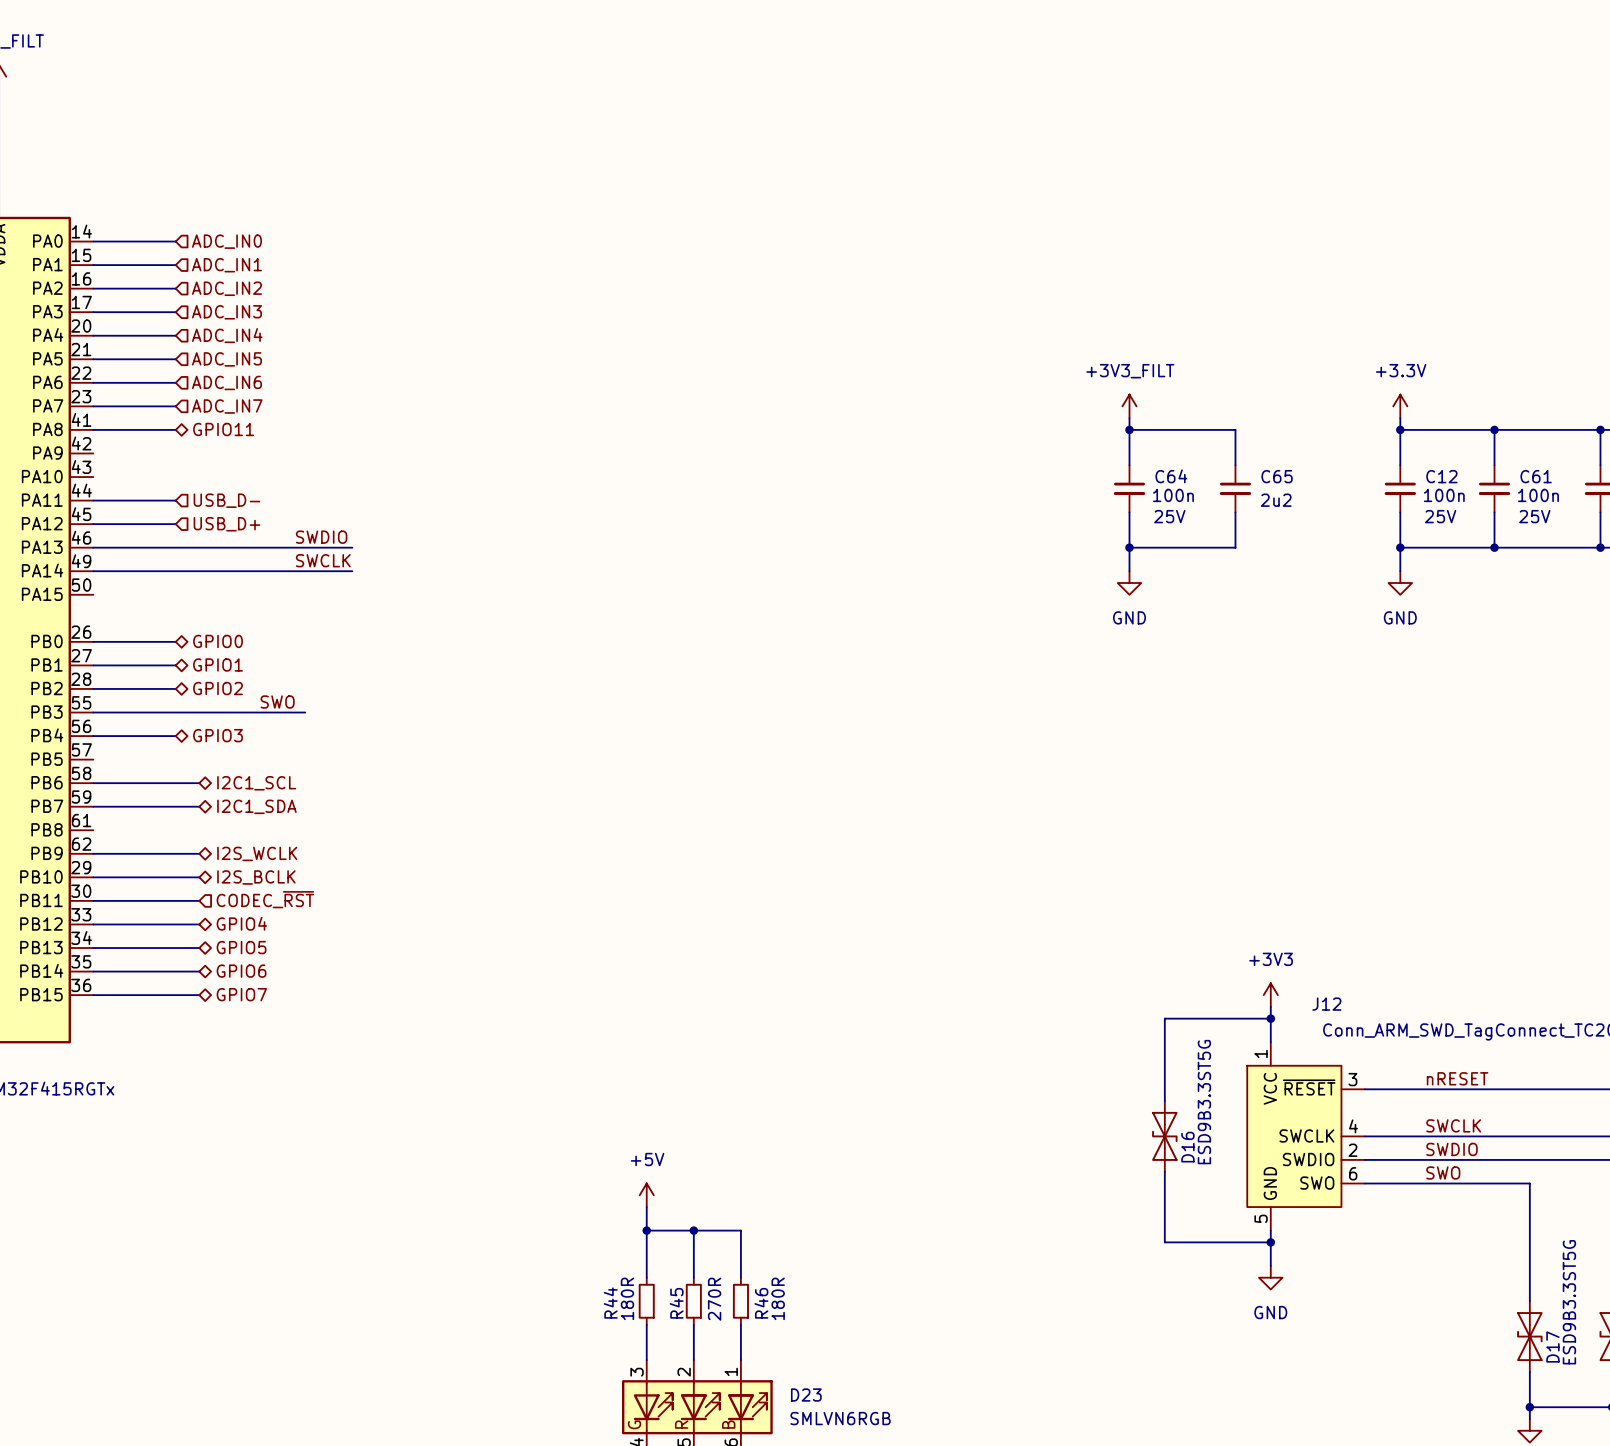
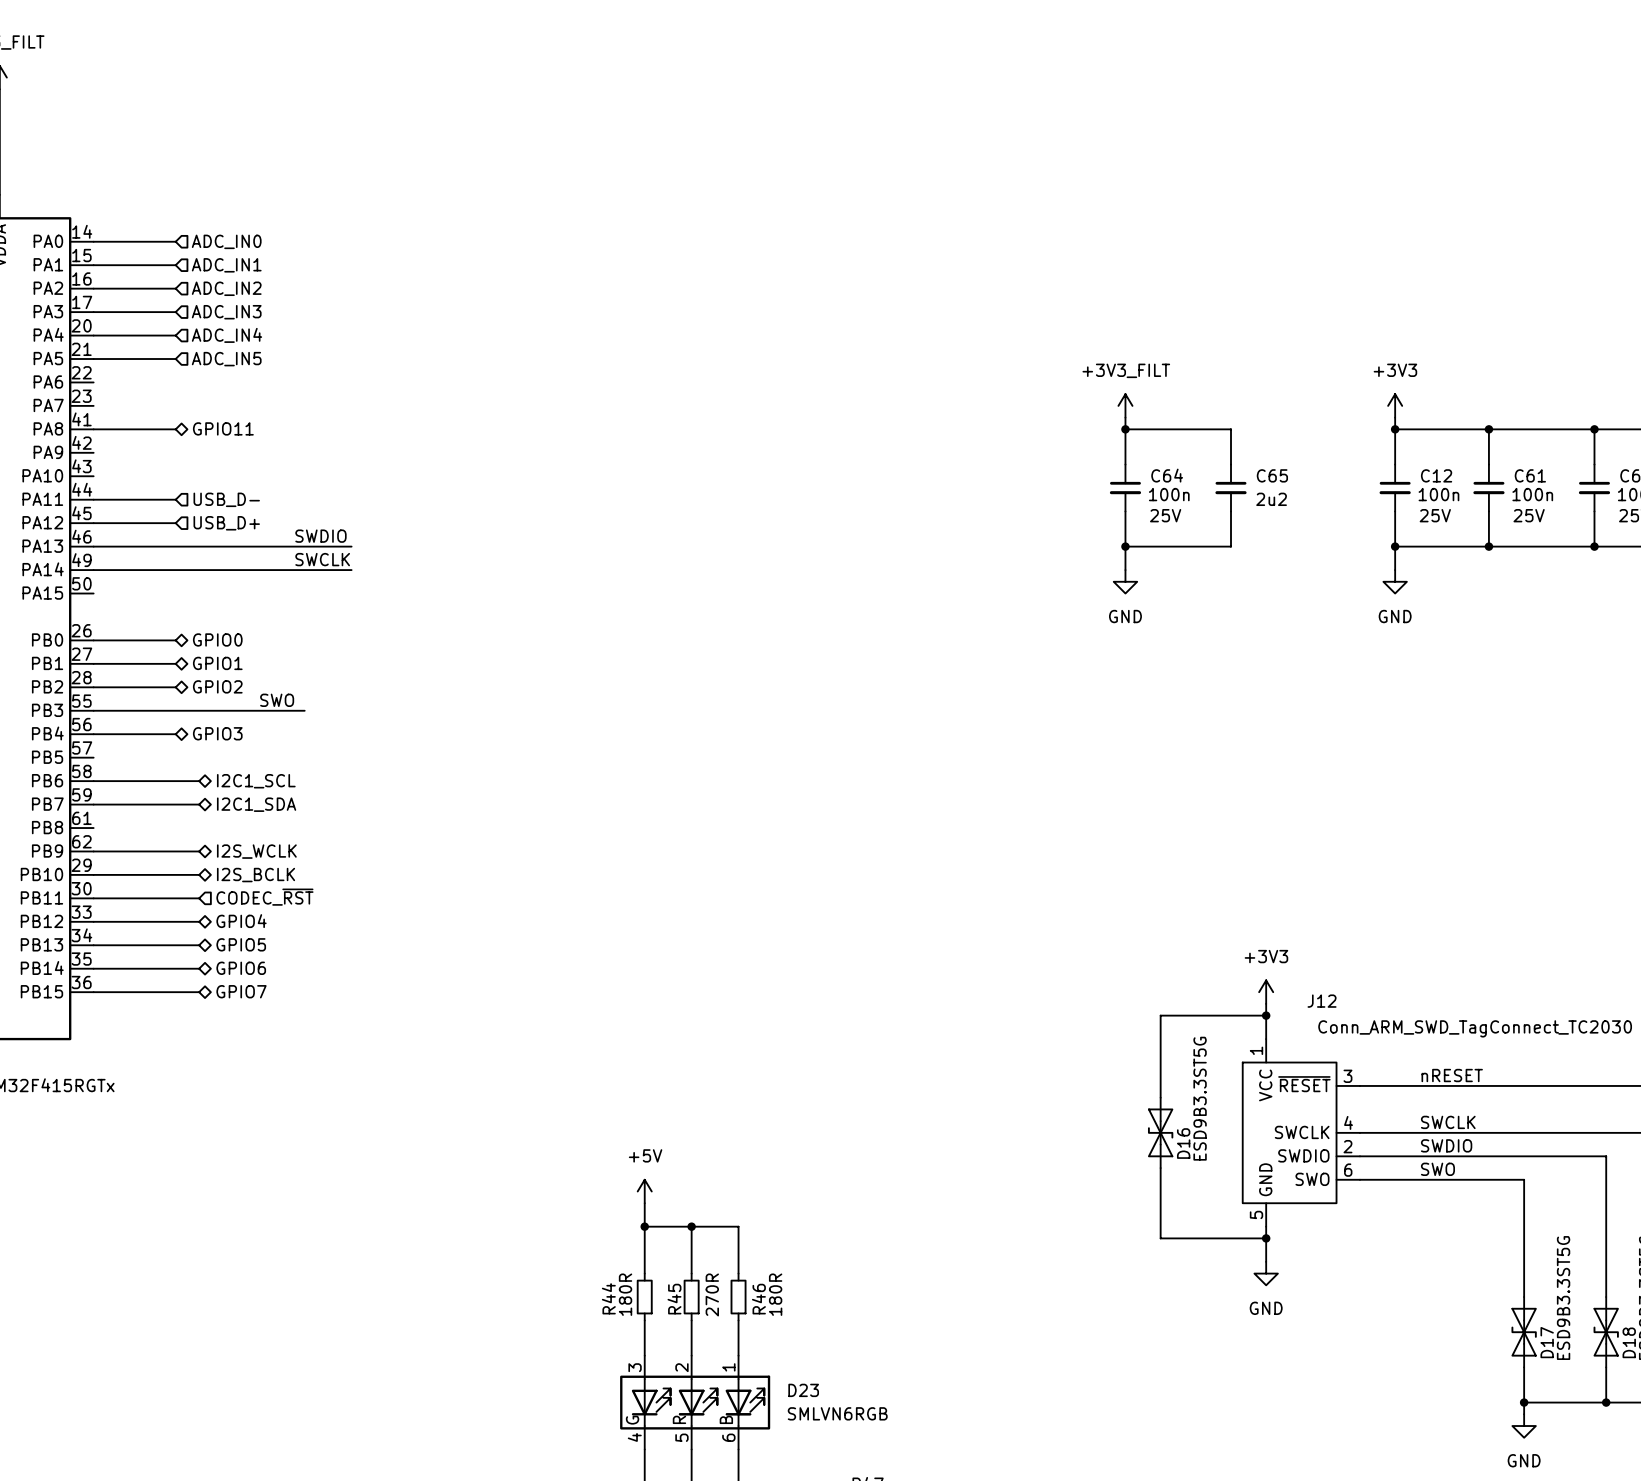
wire: (93, 382) (175, 382) -> none
hierarchical label: ADC_IN6 (226, 382) -> none
wire: (93, 406) (175, 406) -> none
hierarchical label: ADC_IN7 (227, 406) -> none
power symbol: +3.3V (1400, 406) -> +3V3 (1395, 405)

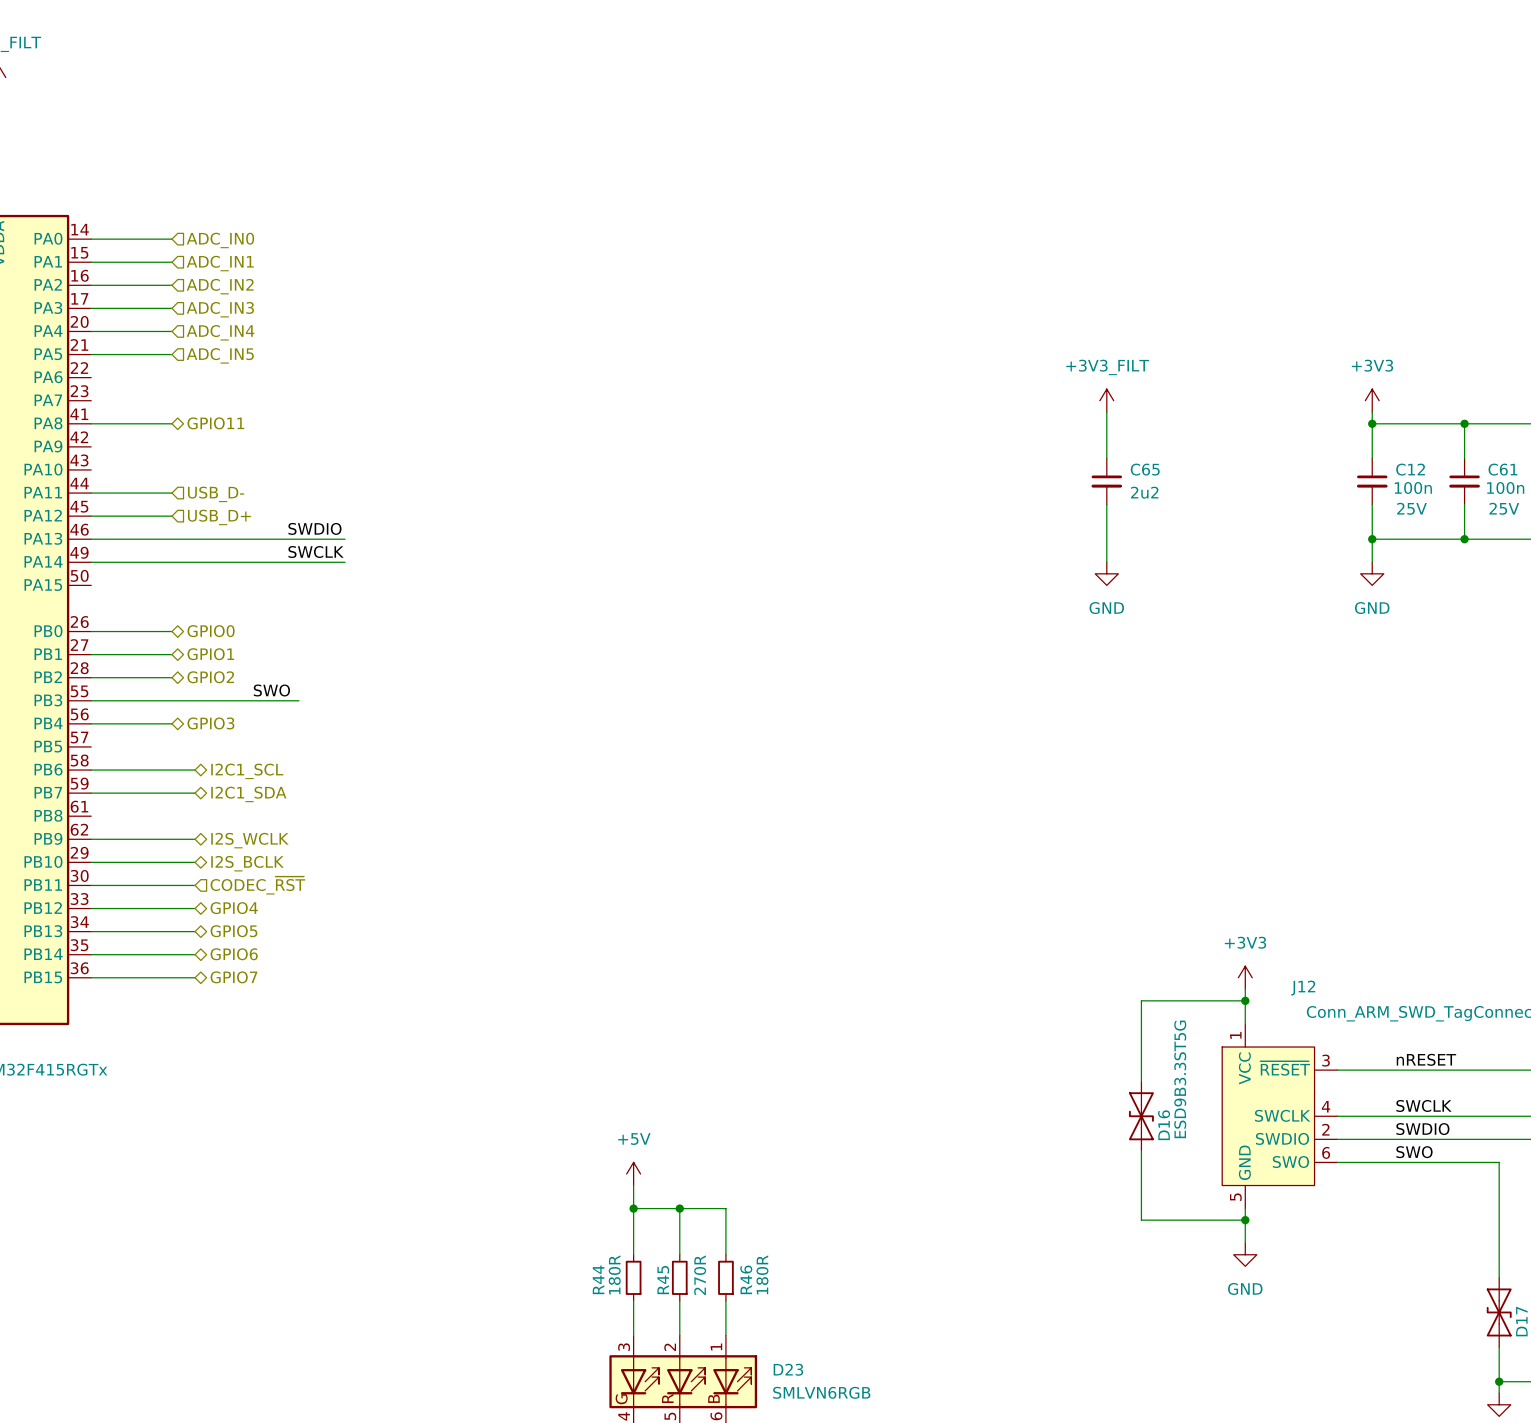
wire: (1125, 429) (1231, 429) (1231, 464) -> none
junction: (1125, 429) -> none
C64 name: C64 (1167, 475) -> C65 (1145, 469)
C65: 2u2 (1231, 487) -> none
C64 value: 100n (1169, 494) -> 2u2 (1144, 492)
wire: (1231, 511) (1231, 546) (1125, 546) -> none
C64 text: 25V (1165, 515) -> none
junction: (1125, 546) -> none

